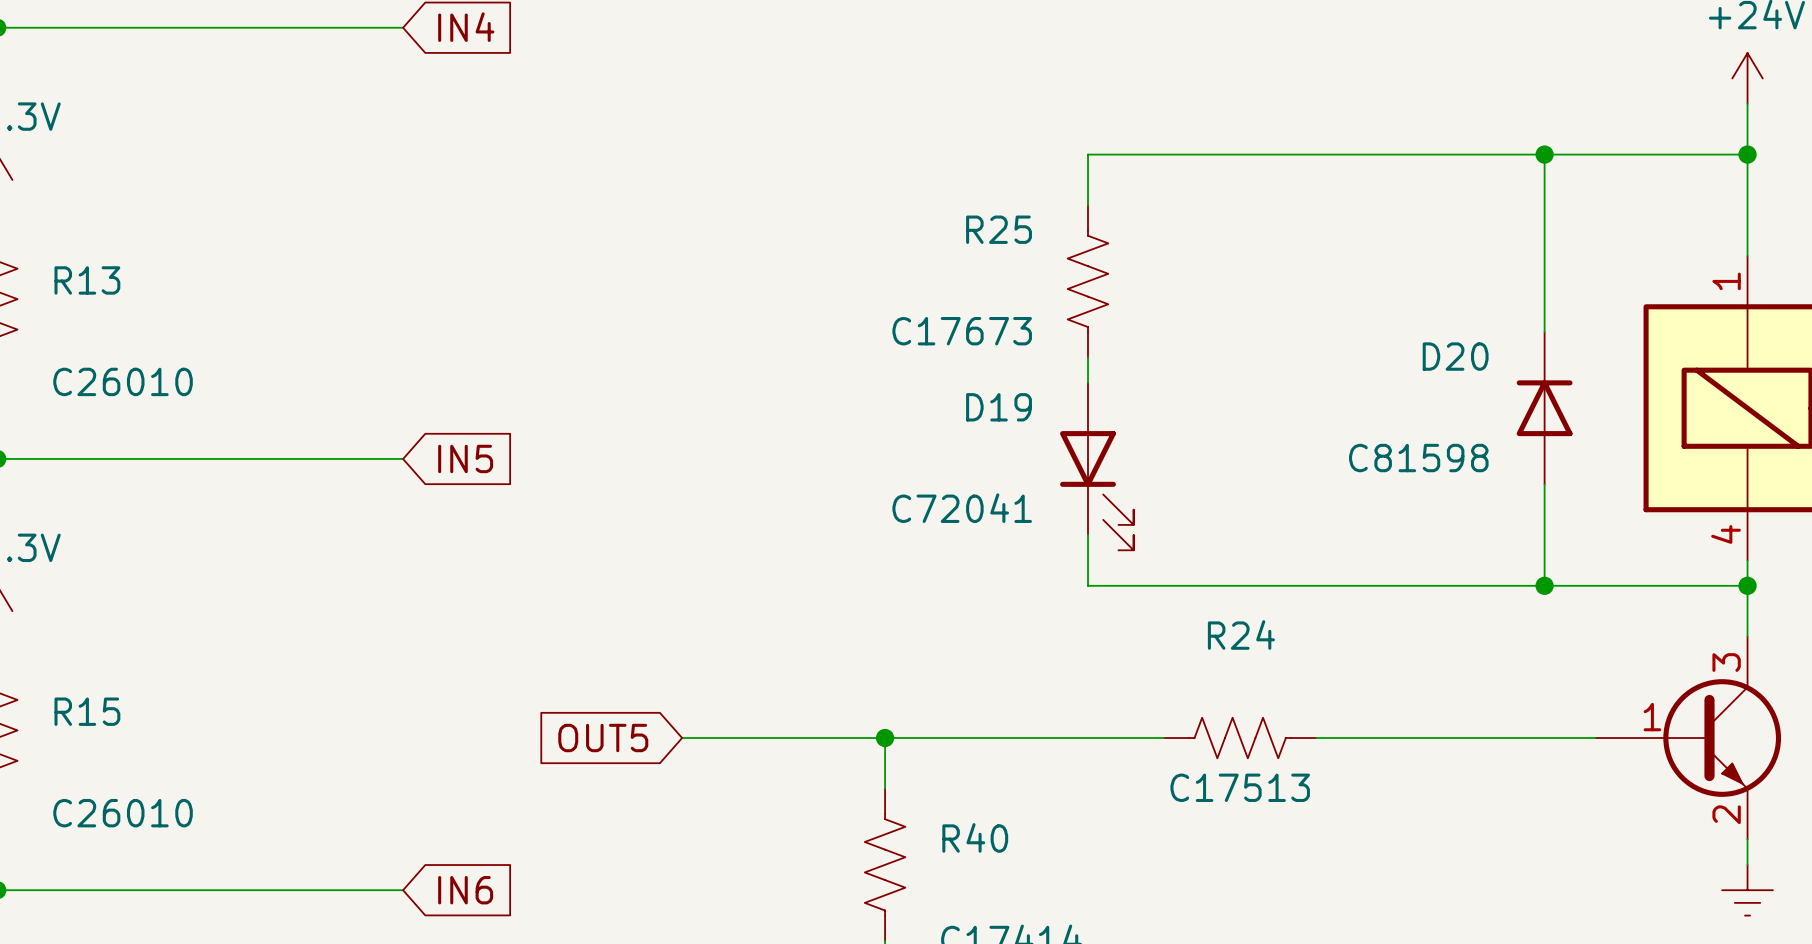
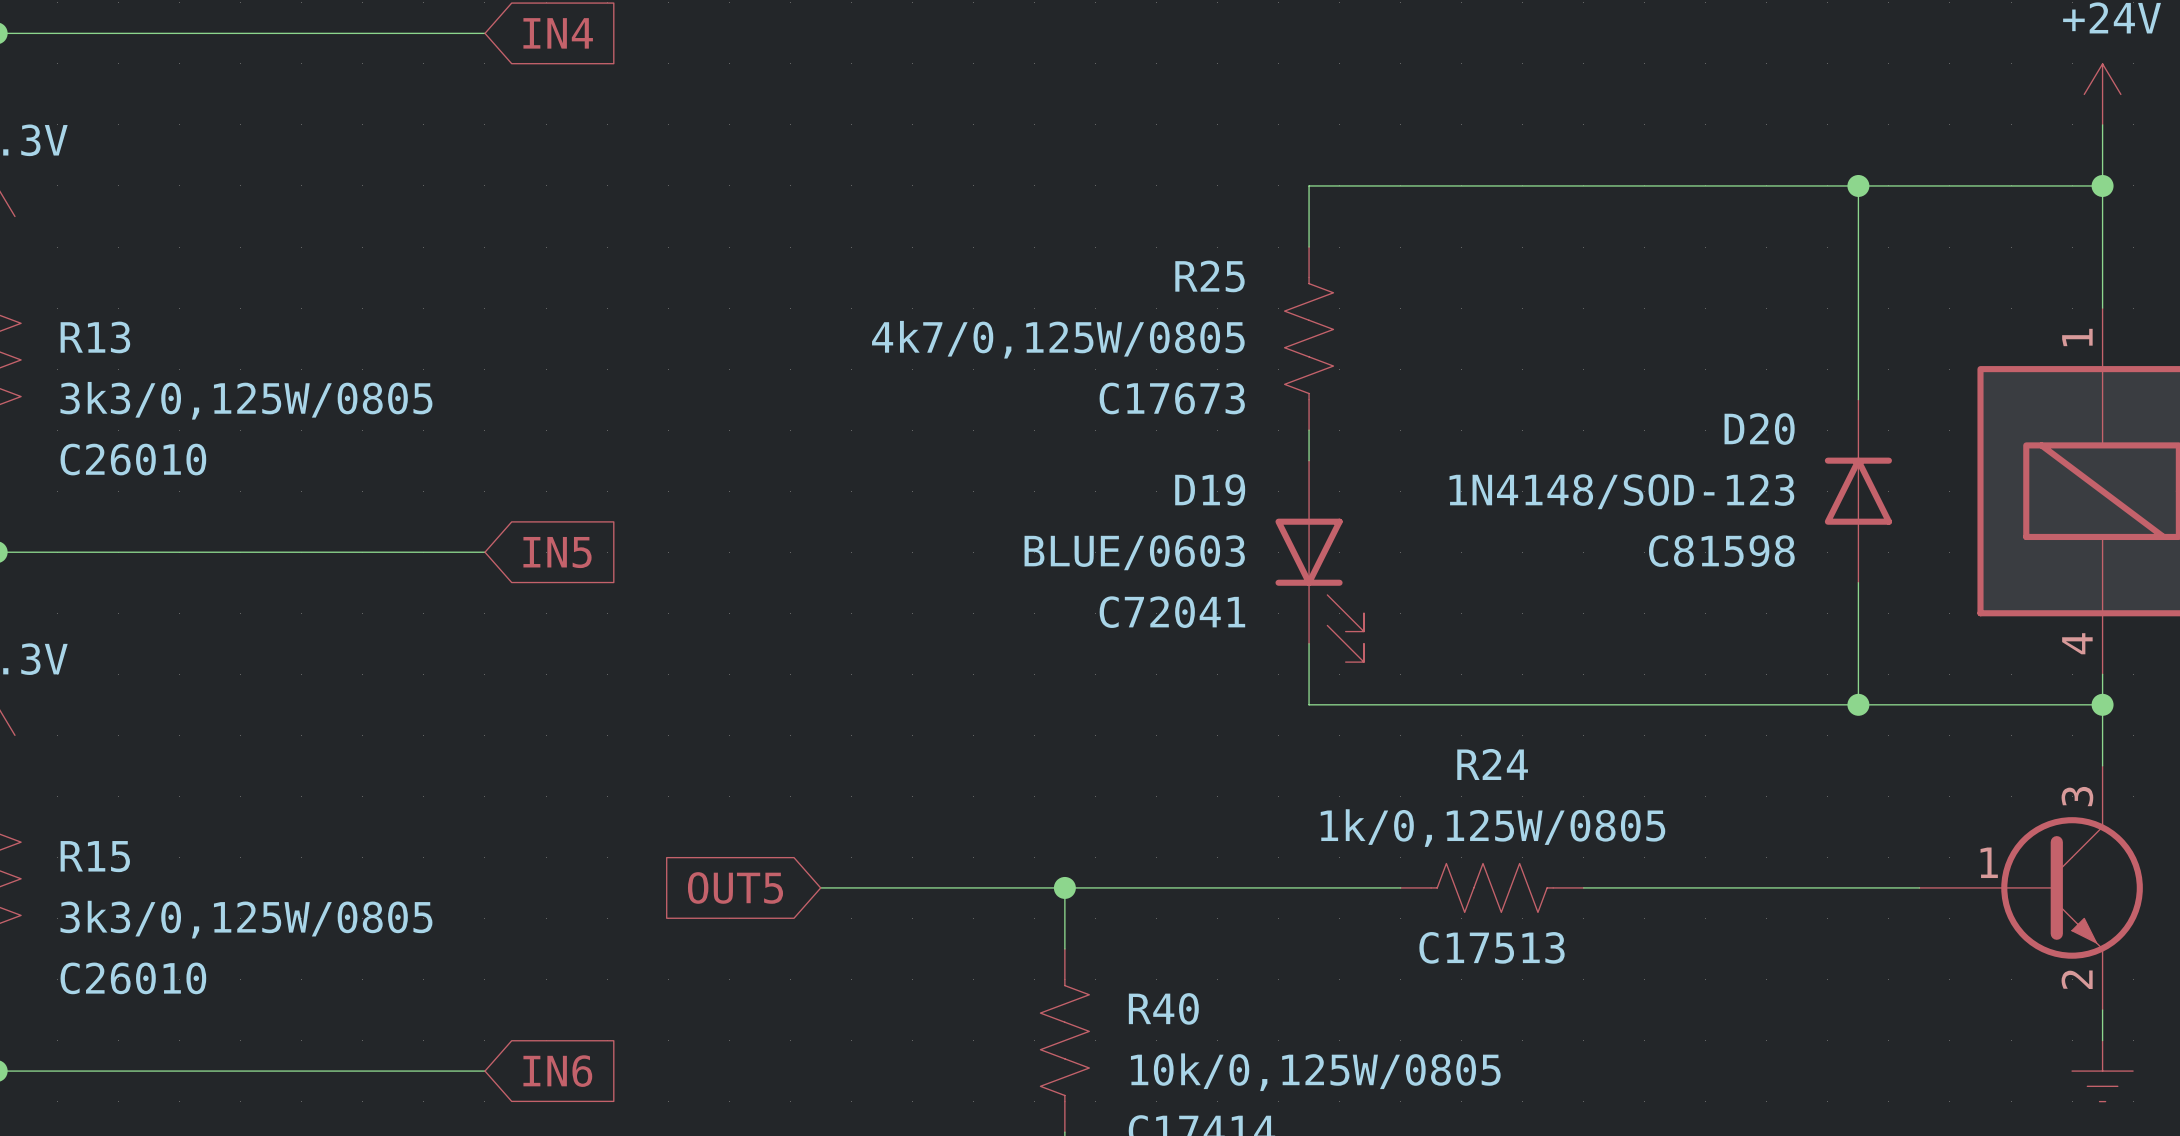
R25 value: none -> 4k7/0,125W/0805 (1058, 339)
R13 value: none -> 3k3/0,125W/0805 (246, 400)
D20 value: none -> 1N4148/SOD-123 (1621, 491)
D19 value: none -> BLUE/0603 (1134, 552)
R24 value: none -> 1k/0,125W/0805 (1493, 828)
R15 value: none -> 3k3/0,125W/0805 (246, 919)
R40 value: none -> 10k/0,125W/0805 (1315, 1072)

